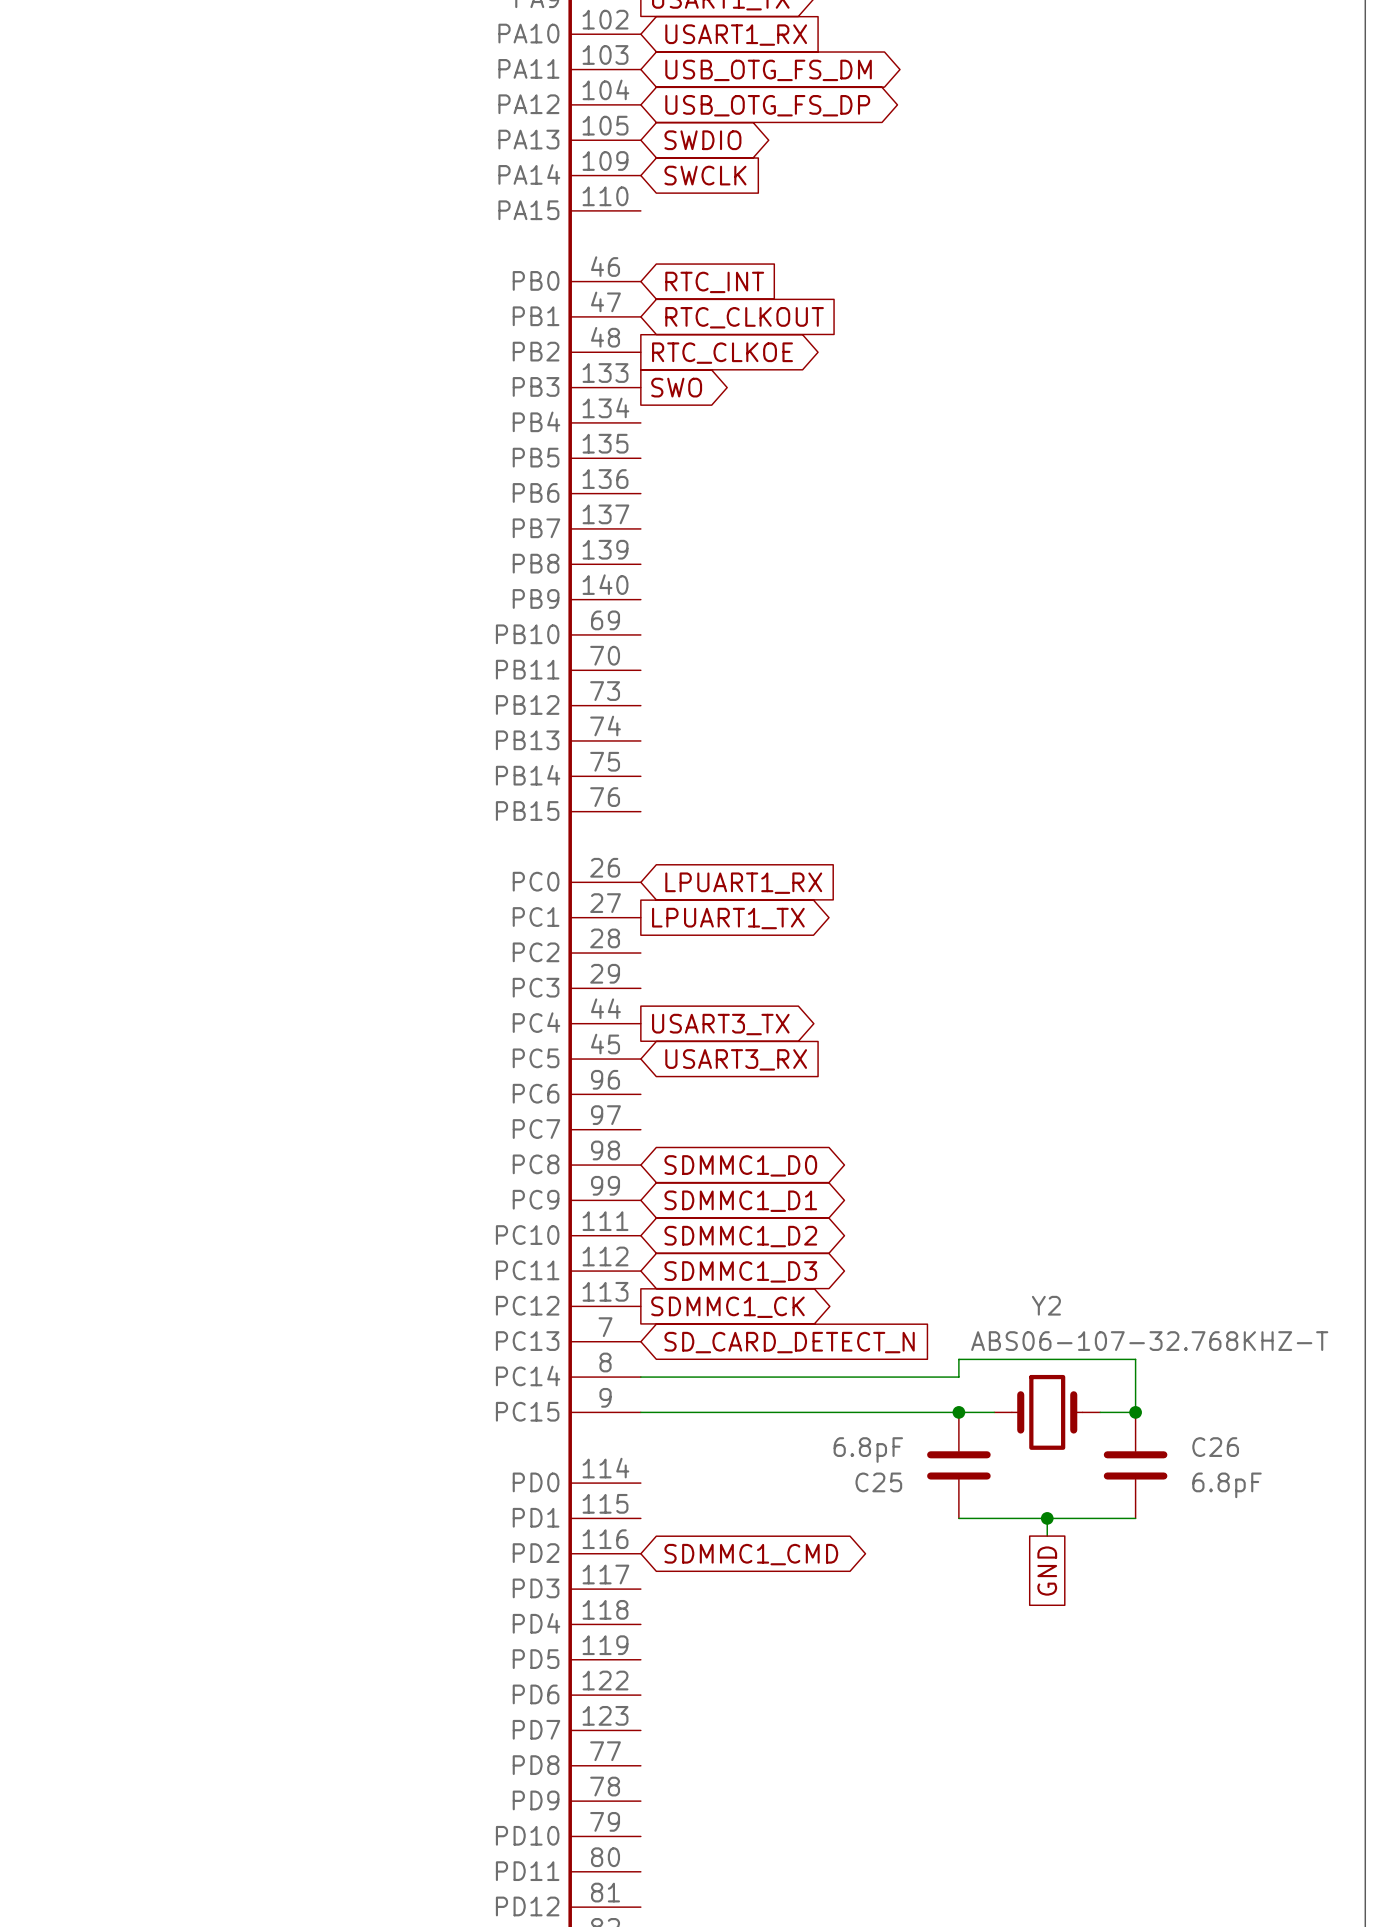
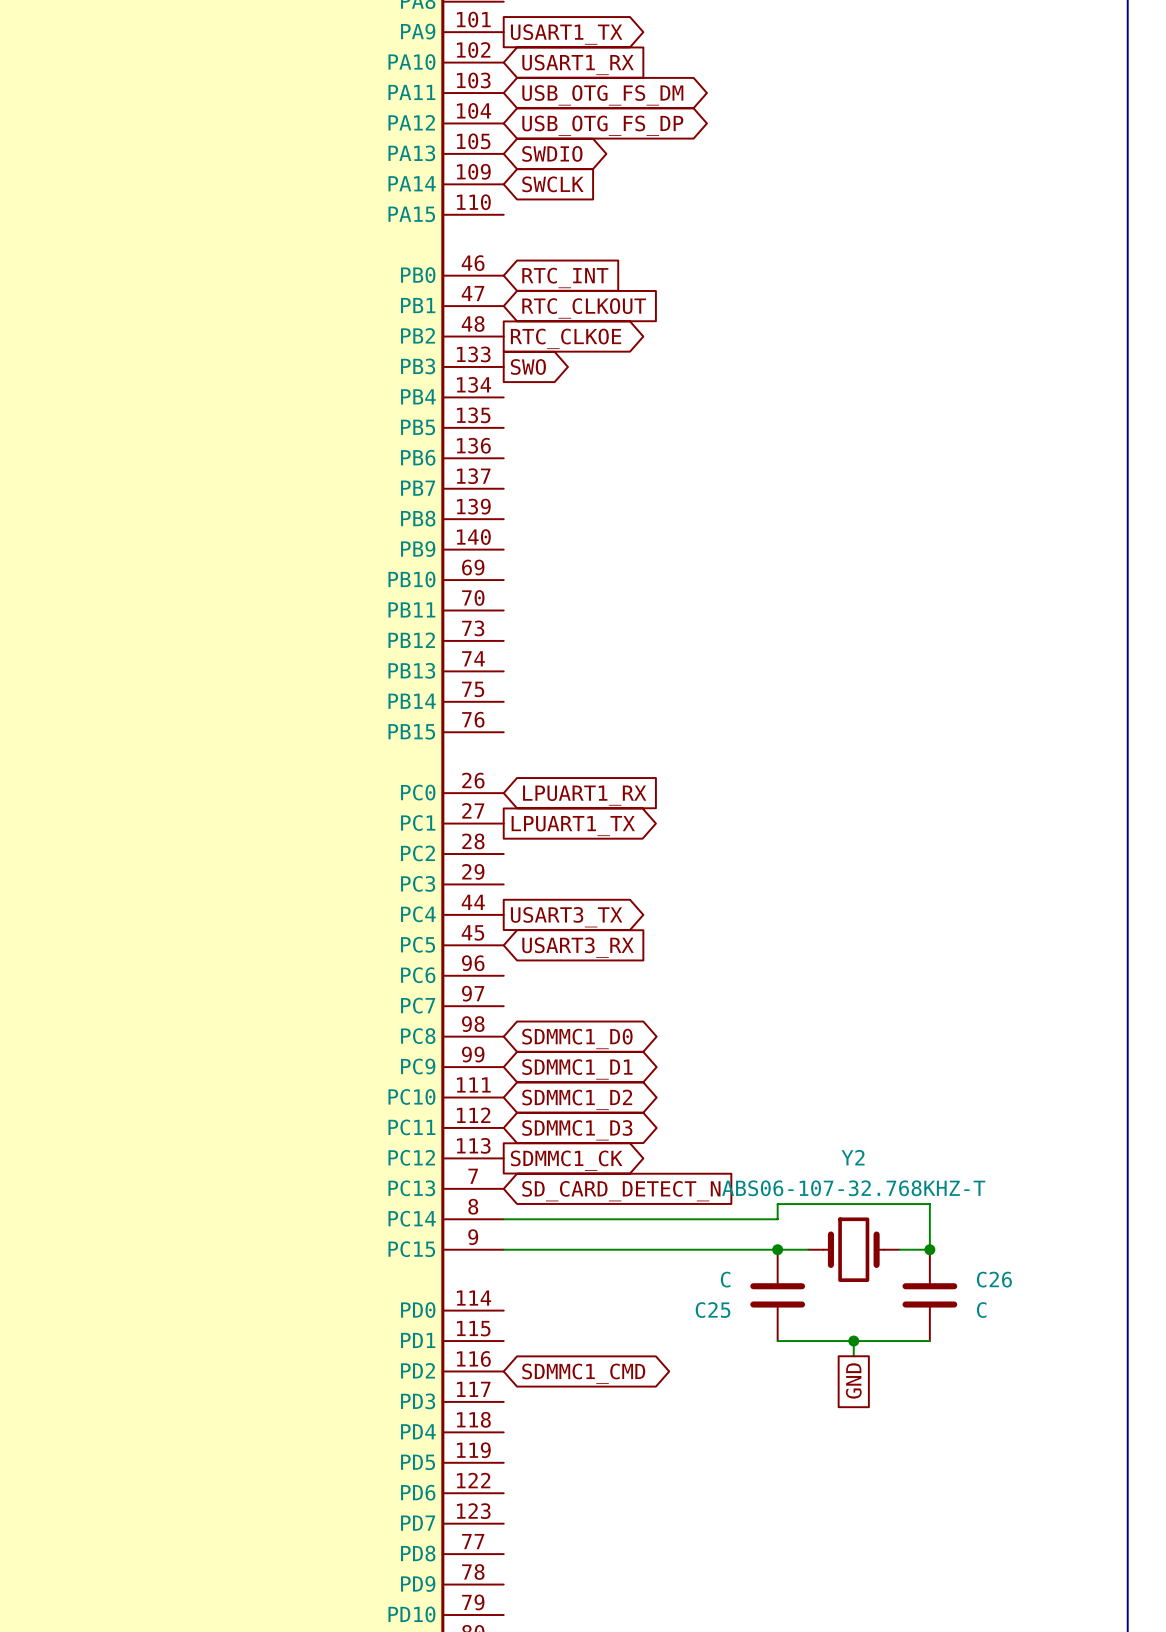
Y2 value position: ABS06-107-32.768KHZ-T (1149, 1341) -> ABS06-107-32.768KHZ-T (853, 1188)
C25 value: 6.8pF (868, 1450) -> C (725, 1279)
C26 value: 6.8pF (1227, 1485) -> C (981, 1310)

